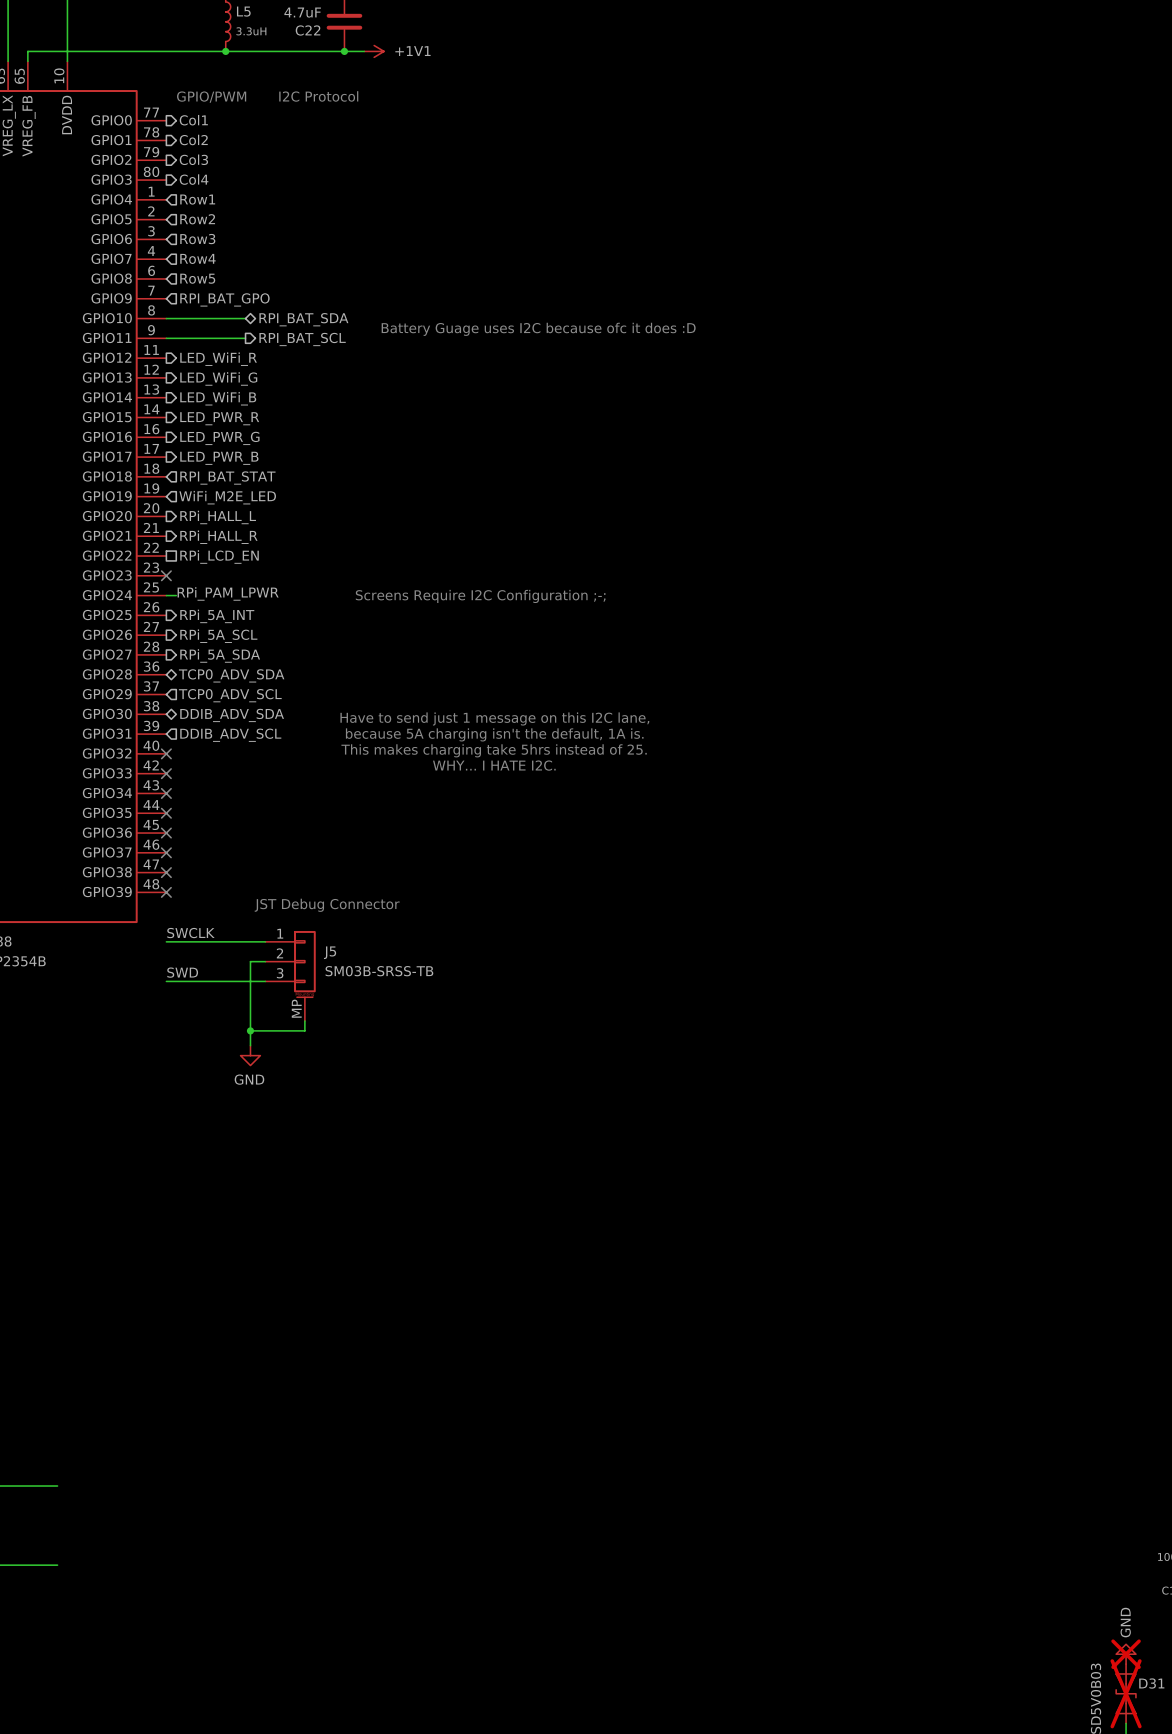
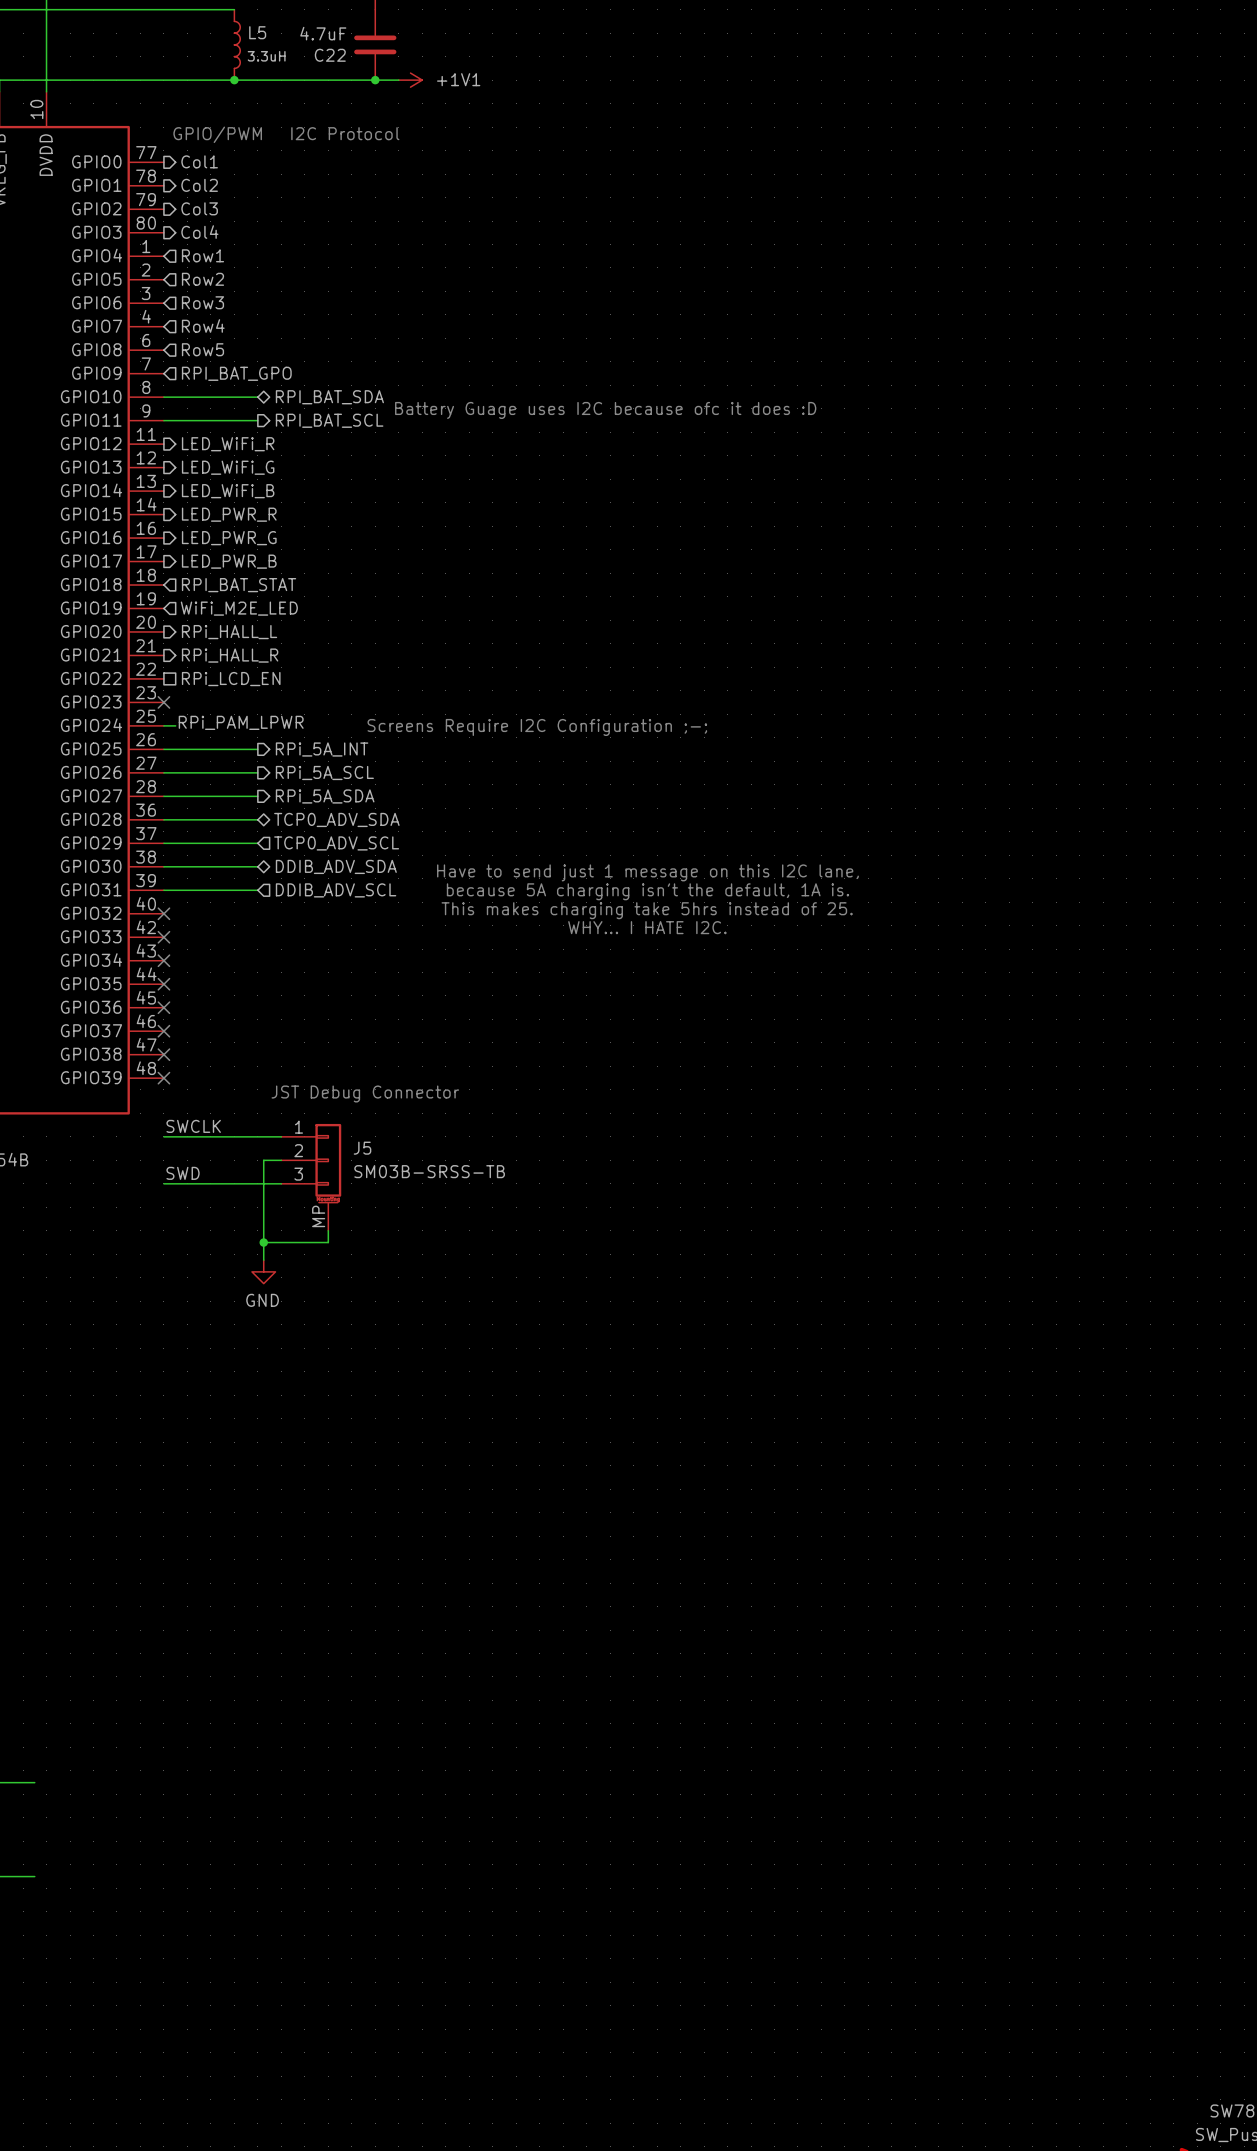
wire: none -> (163, 749) (257, 749)
hierarchical label position: RPi_5A_INT (217, 616) -> RPi_5A_INT (322, 749)
wire: none -> (163, 772) (257, 772)
hierarchical label position: RPi_5A_SCL (218, 636) -> RPi_5A_SCL (324, 772)
wire: none -> (163, 796) (257, 796)
hierarchical label position: RPi_5A_SDA (220, 655) -> RPi_5A_SDA (325, 796)
wire: none -> (163, 819) (257, 819)
hierarchical label position: TCP0_ADV_SDA (231, 675) -> TCP0_ADV_SDA (336, 819)
wire: none -> (163, 843) (257, 843)
hierarchical label position: TCP0_ADV_SCL (230, 695) -> TCP0_ADV_SCL (336, 843)
wire: none -> (163, 866) (257, 866)
hierarchical label position: DDIB_ADV_SDA (232, 715) -> DDIB_ADV_SDA (336, 866)
text position: Have to send just 1 message on this I2C lane, (494, 718) -> Have to send just 1 message on this I2C lane, (647, 872)
wire: none -> (163, 890) (257, 890)
text position: because 5A charging isn't the default, 1A is. (494, 734) -> because 5A charging isn't the default, 1A is. (647, 891)
hierarchical label position: DDIB_ADV_SCL (230, 735) -> DDIB_ADV_SCL (336, 890)
text position: This makes charging take 5hrs instead of 25. (494, 750) -> This makes charging take 5hrs instead of 25. (647, 910)
text position: WHY... I HATE I2C. (494, 765) -> WHY... I HATE I2C. (647, 927)

